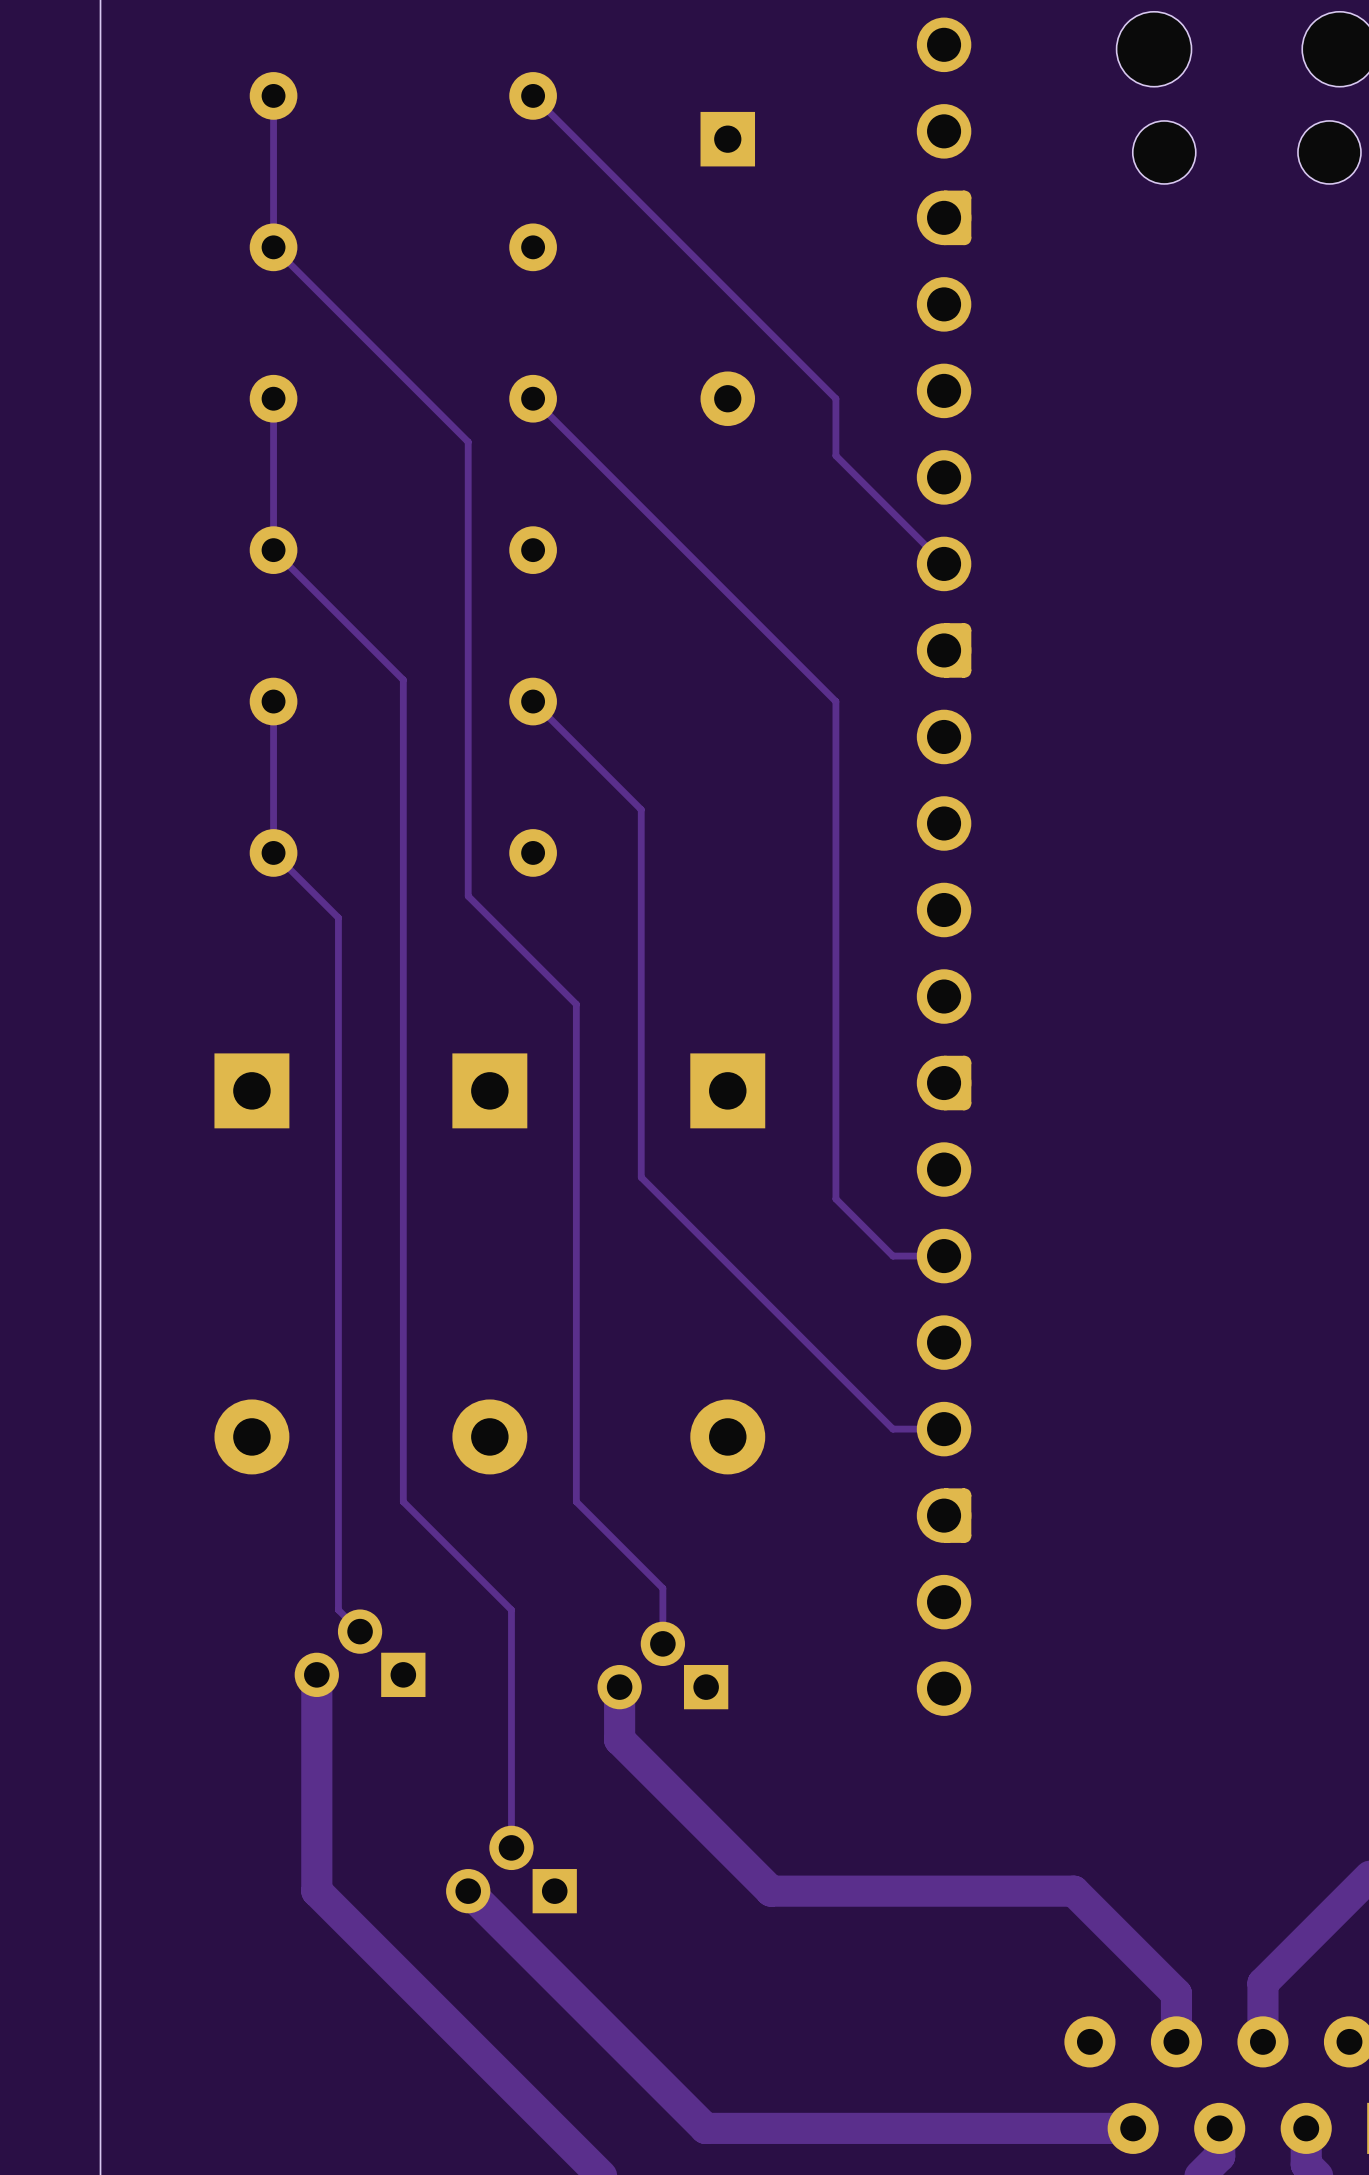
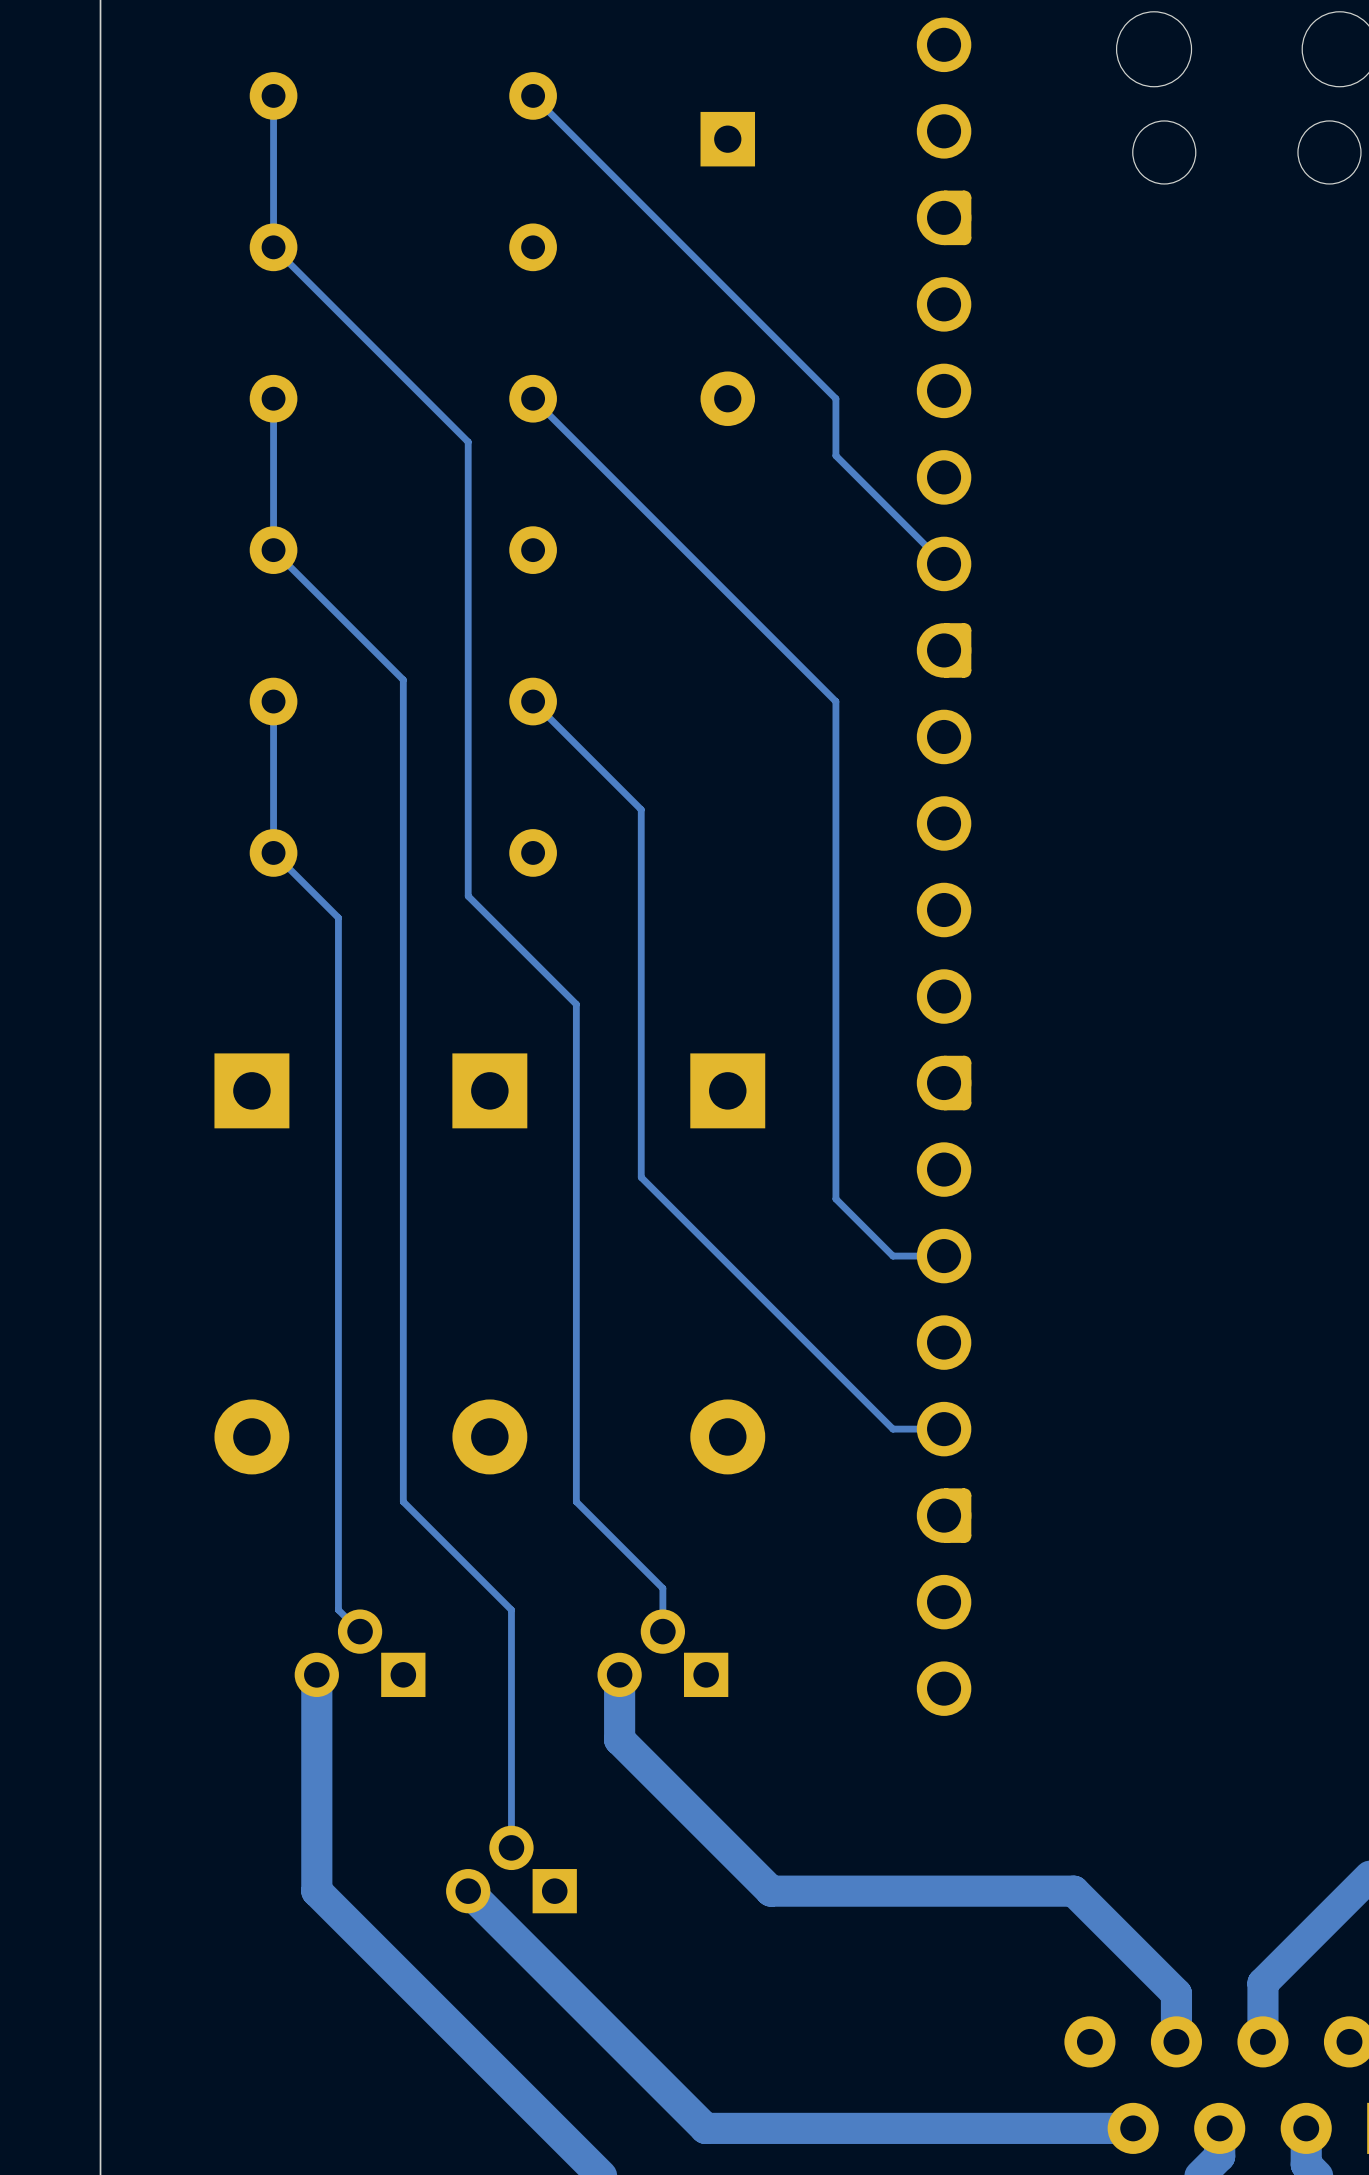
part position: (662, 1665) -> (662, 1653)

